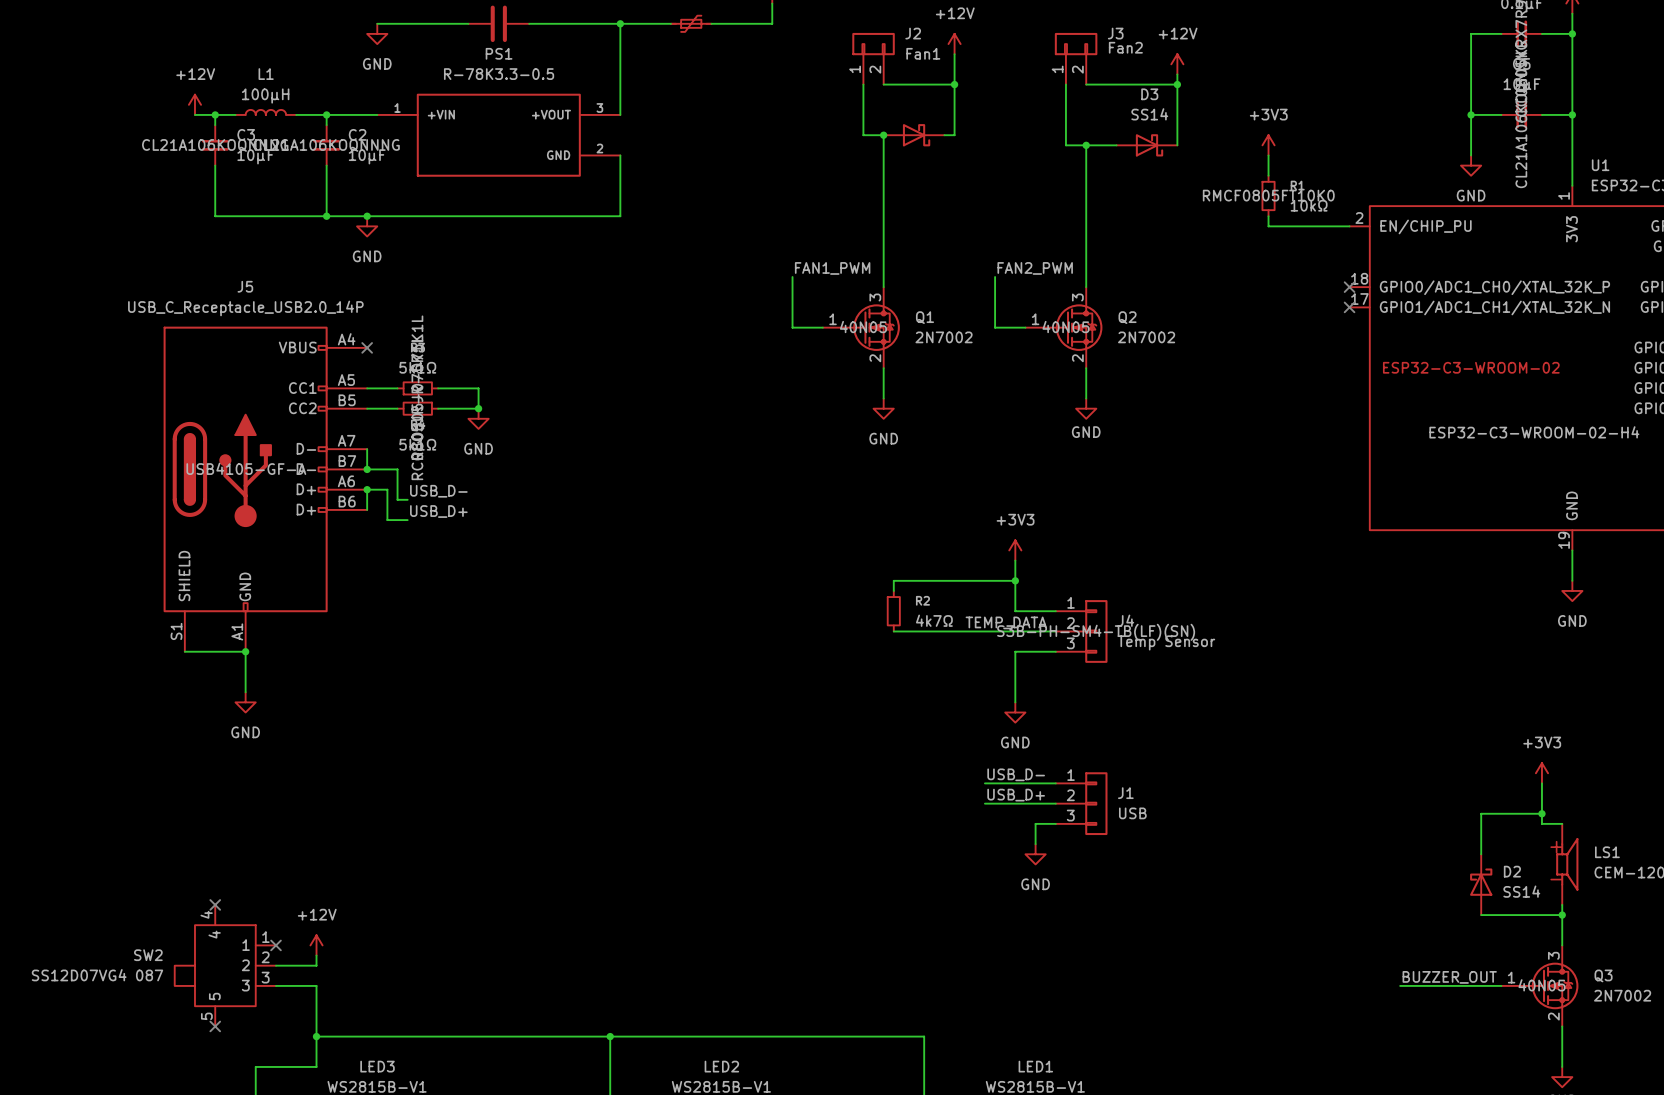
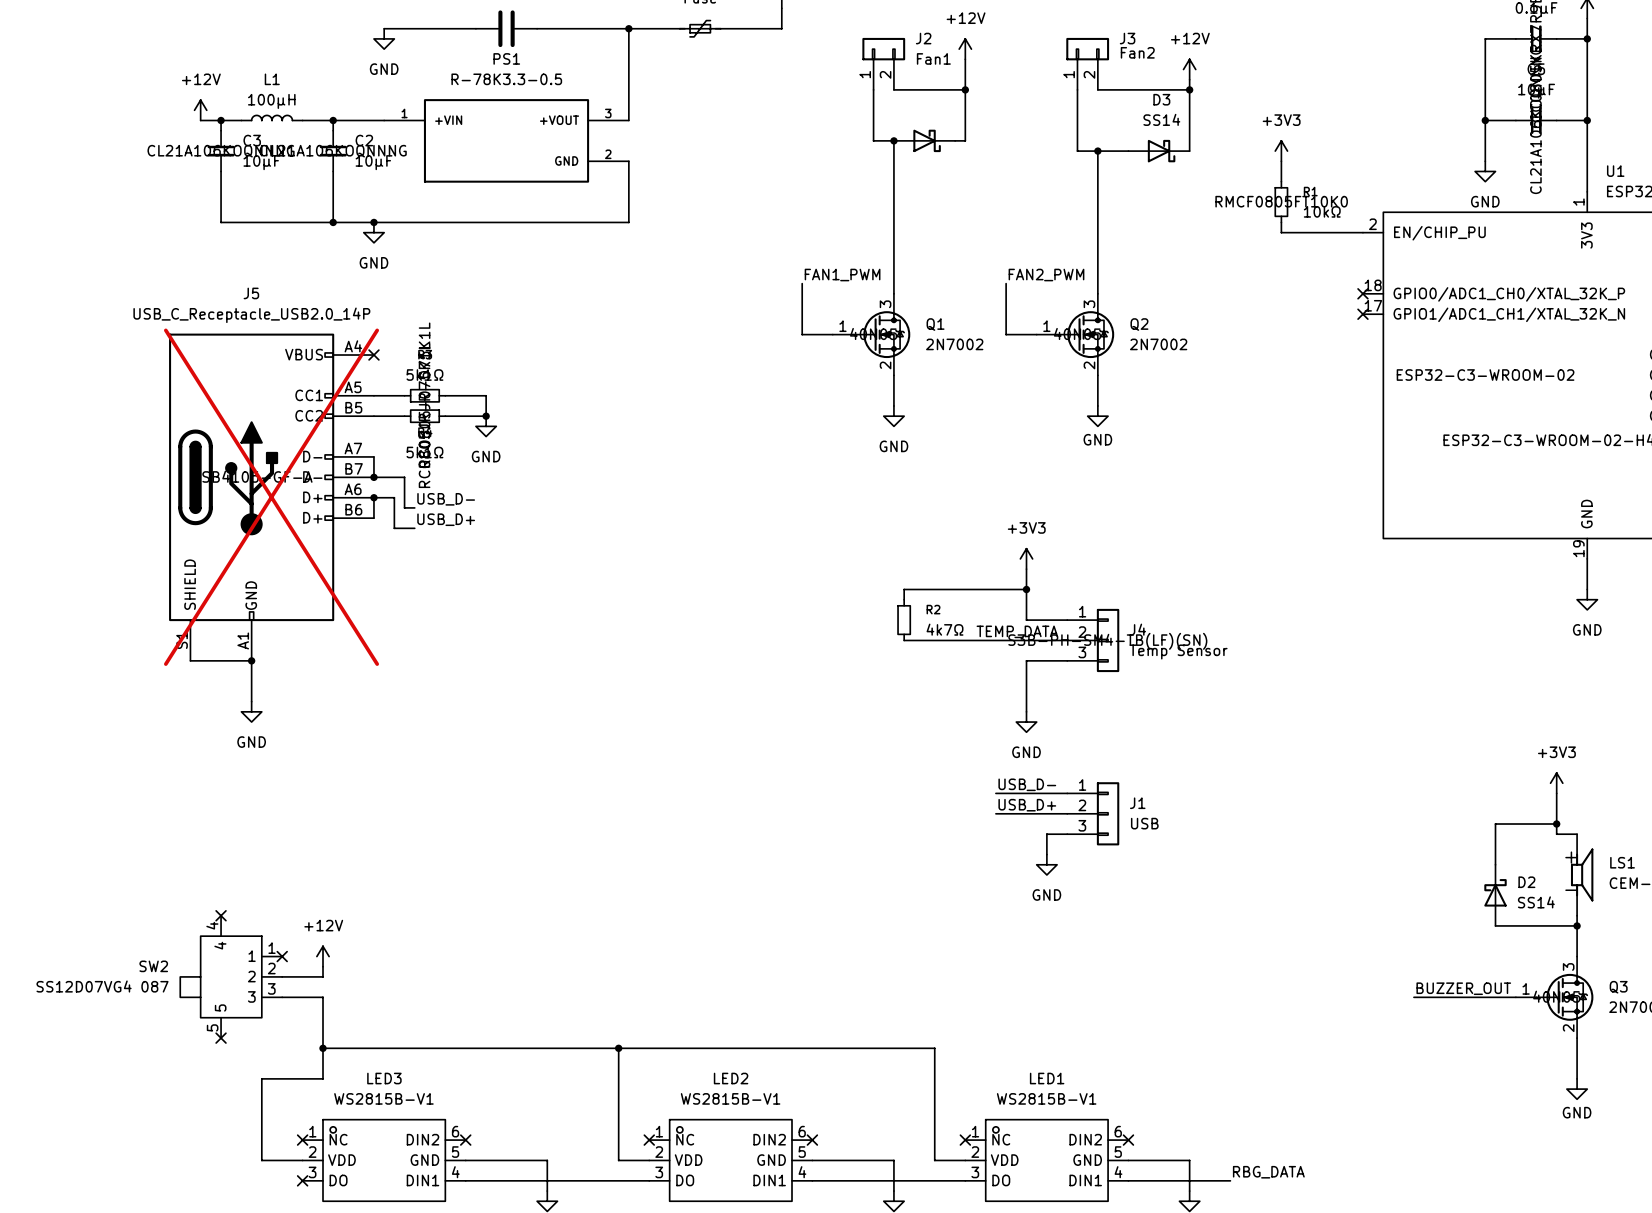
J5 do-not-place cross: none -> (271, 497)

